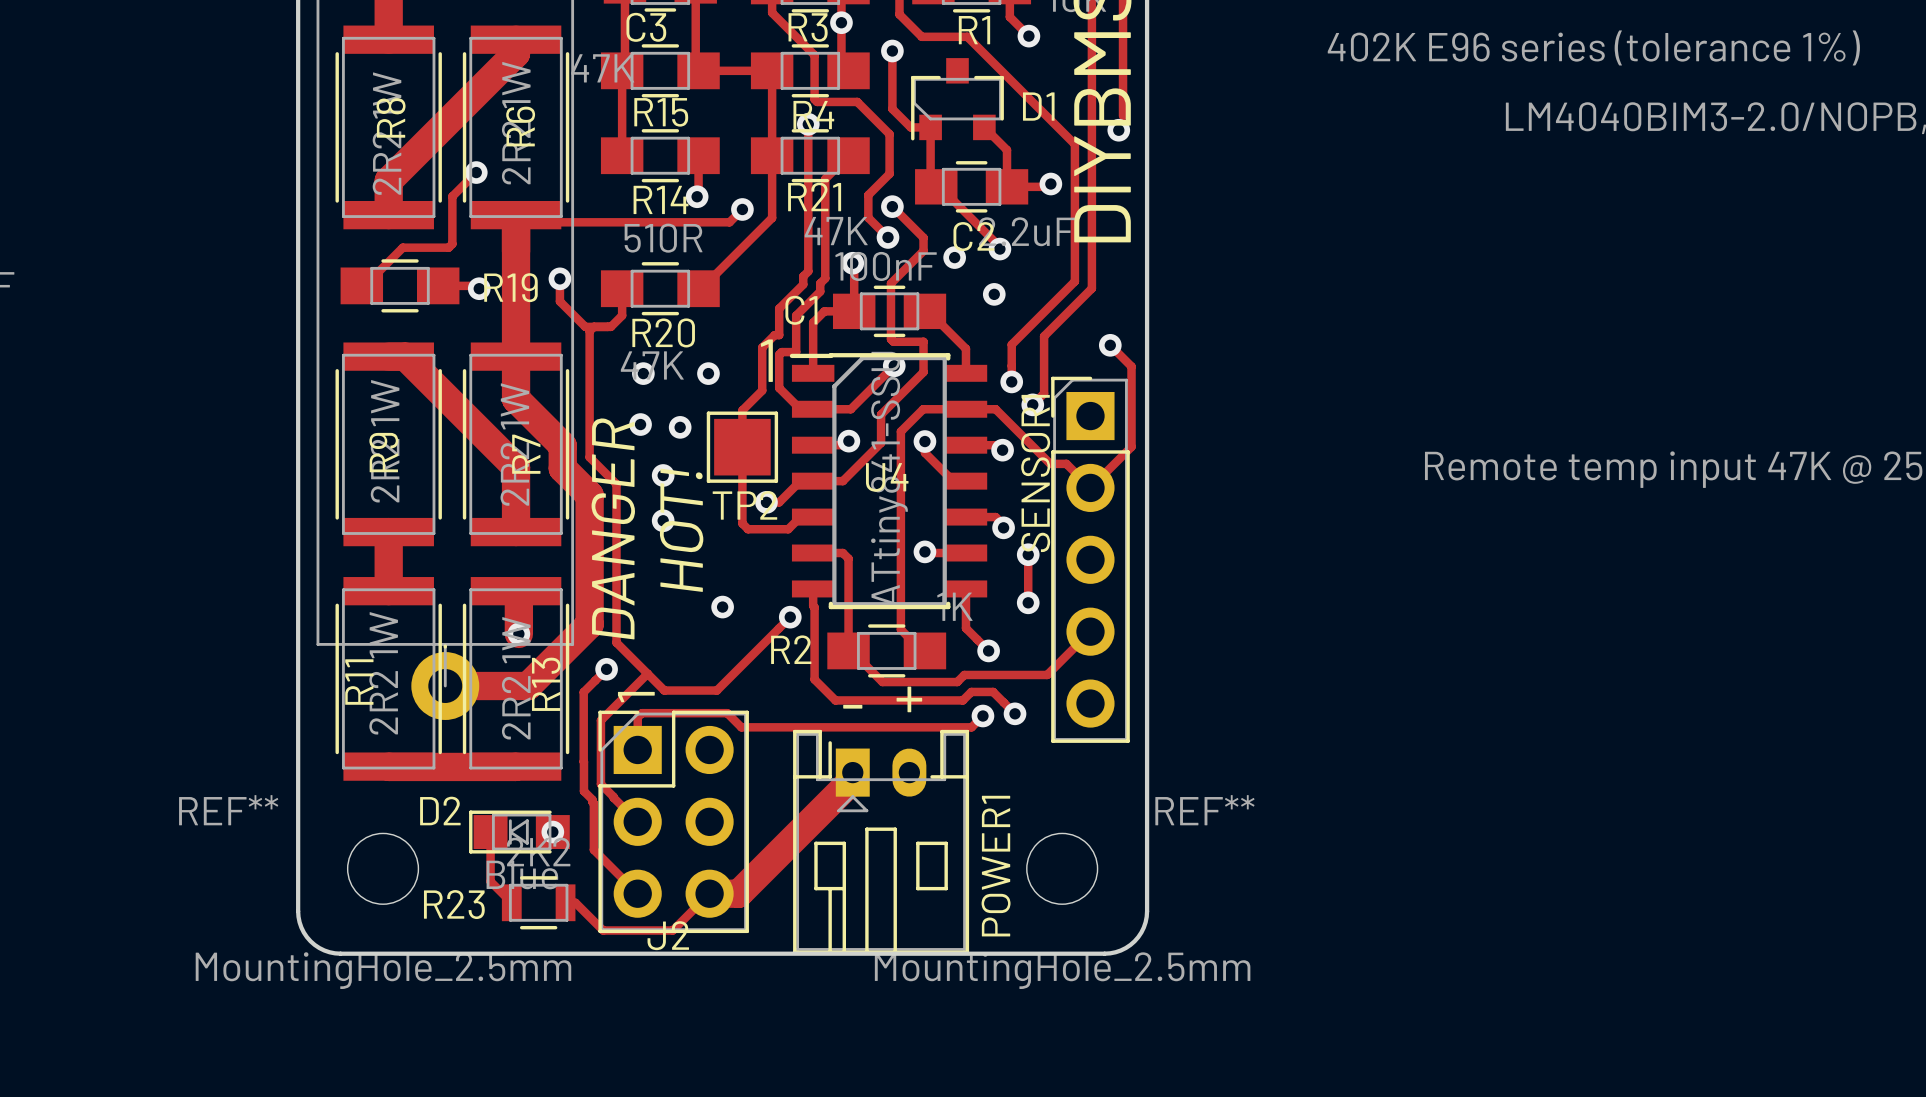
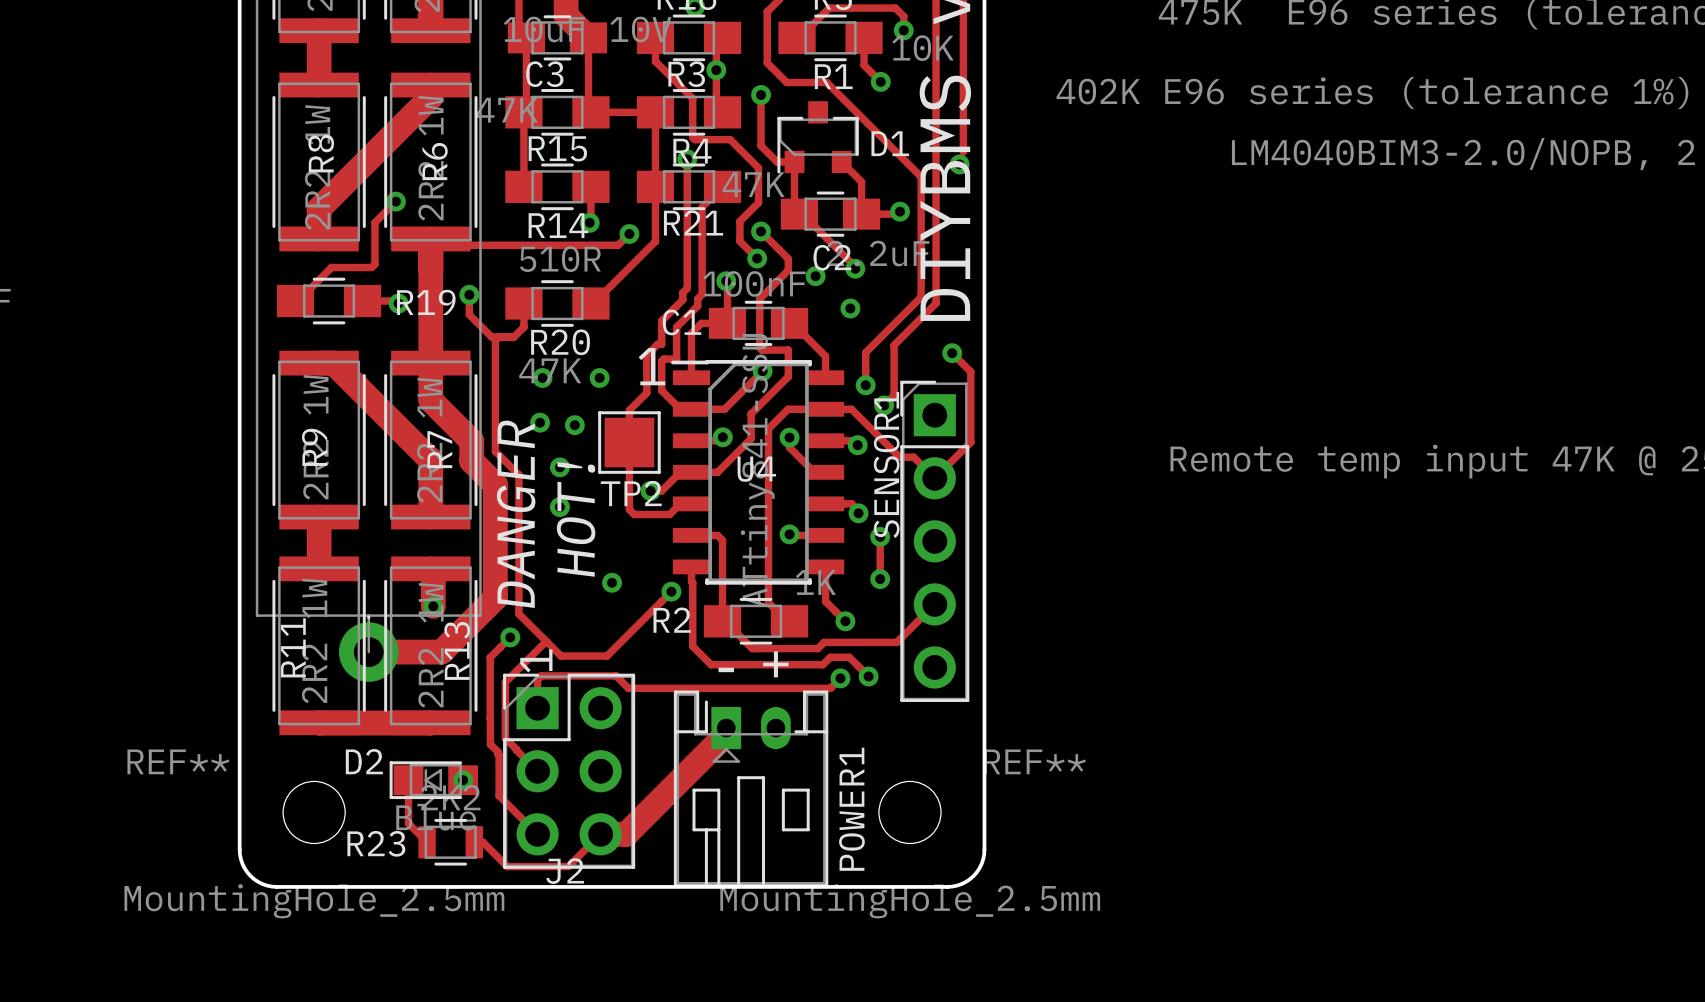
R21 value position: 47K (836, 231) -> 47K (753, 184)

